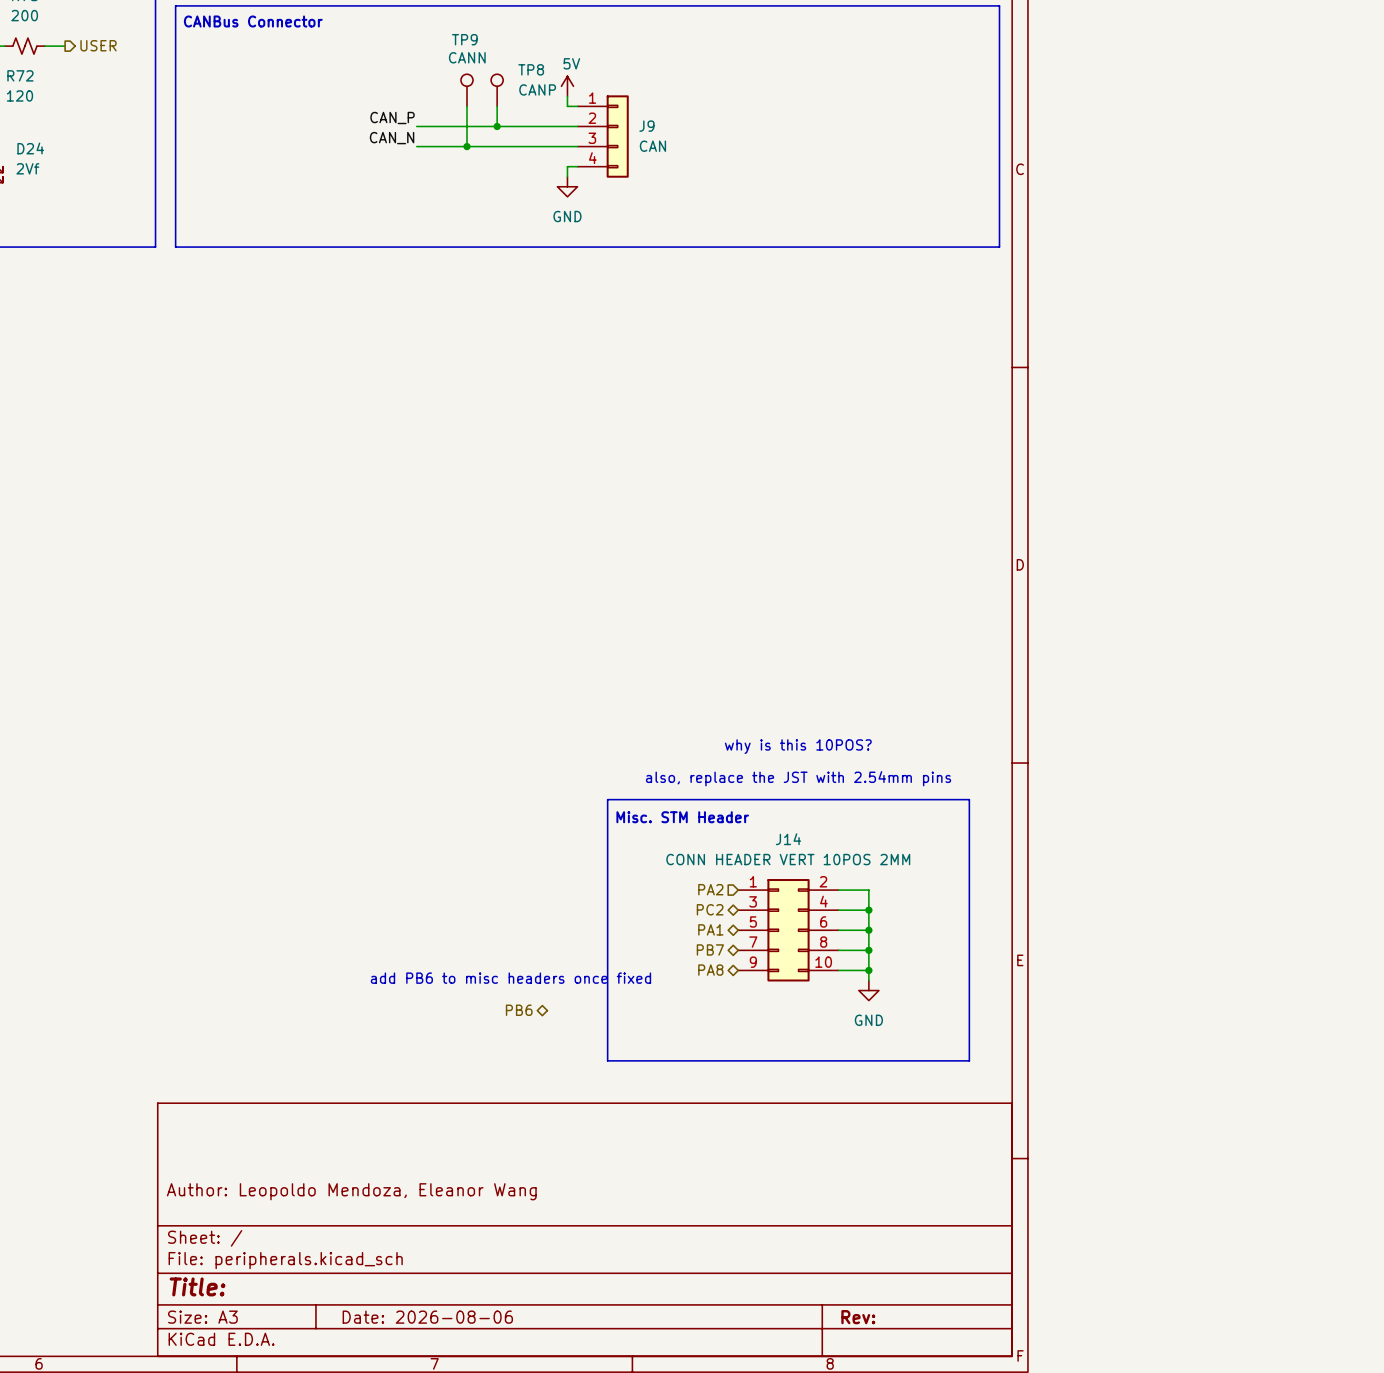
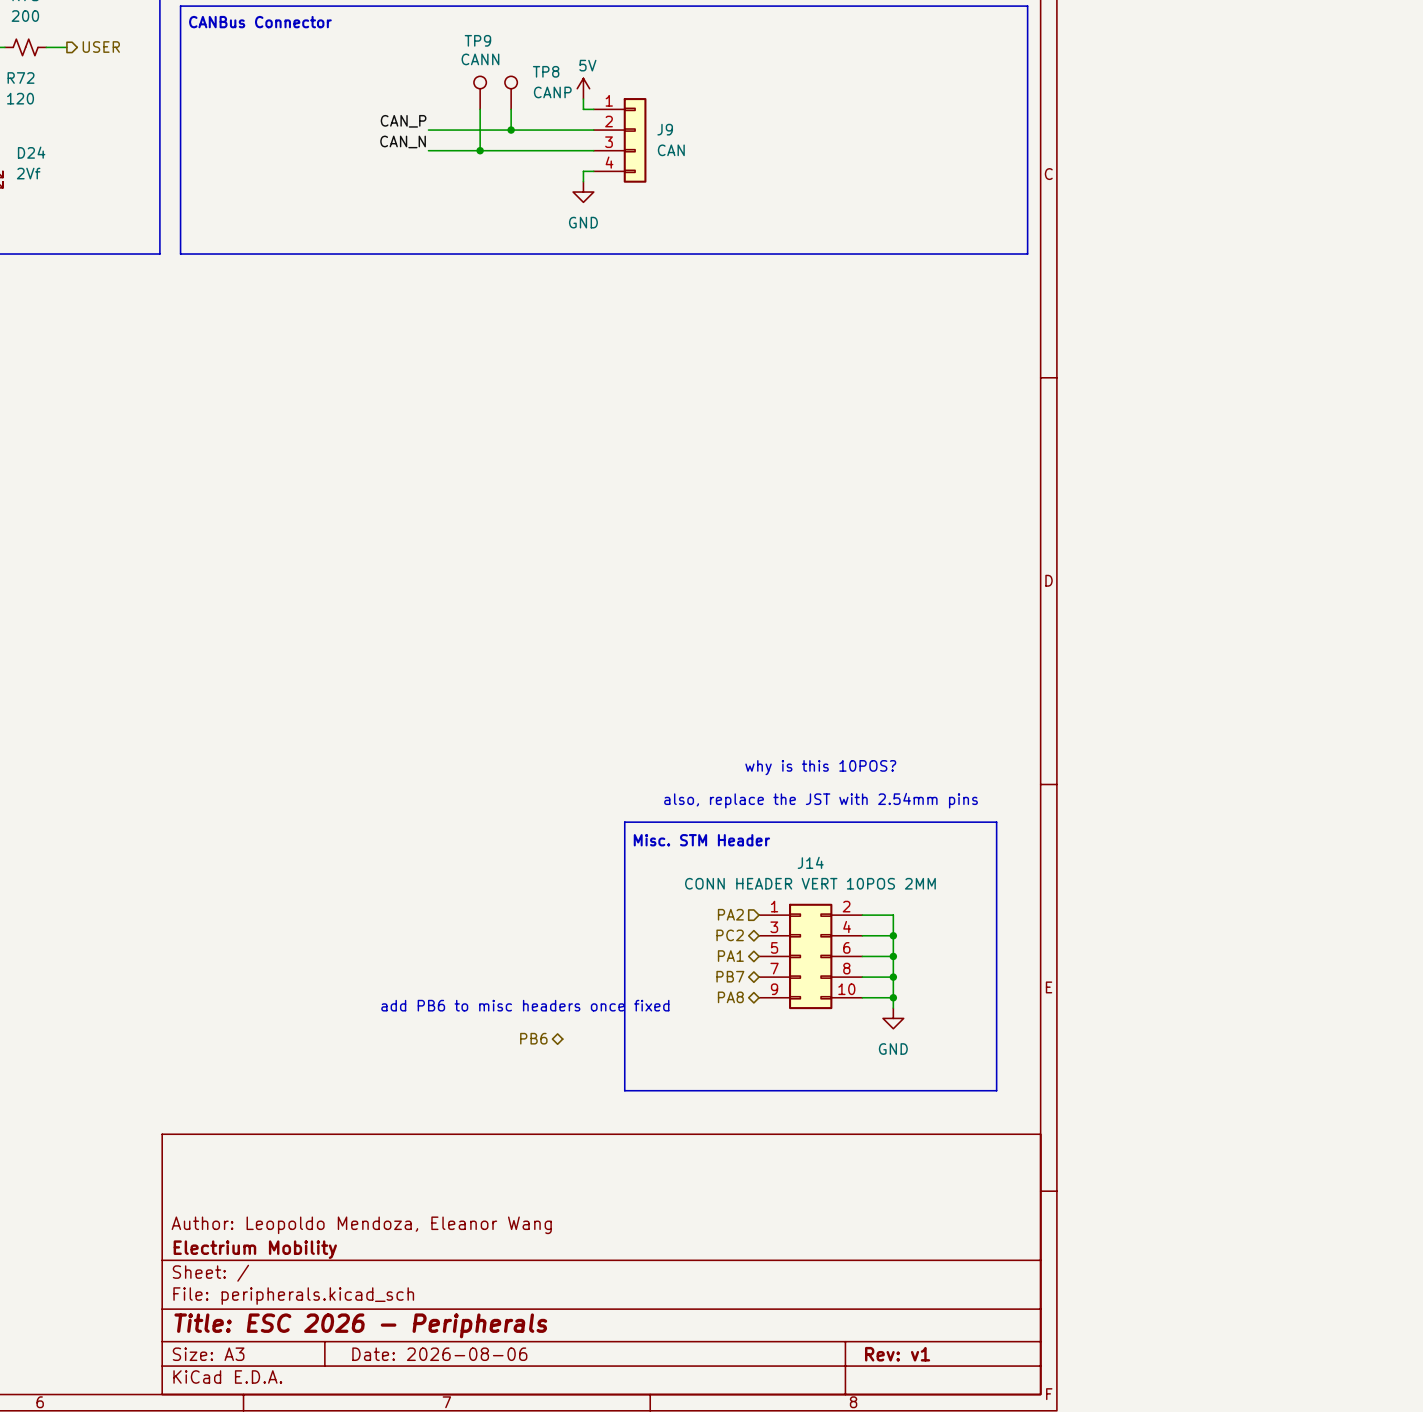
title block: none -> Electrium Mobility (255, 1249)
title block: Title: (197, 1286) -> Title: ESC 2026 - Peripherals (360, 1325)
title block: Rev: (858, 1317) -> Rev: v1 (897, 1354)

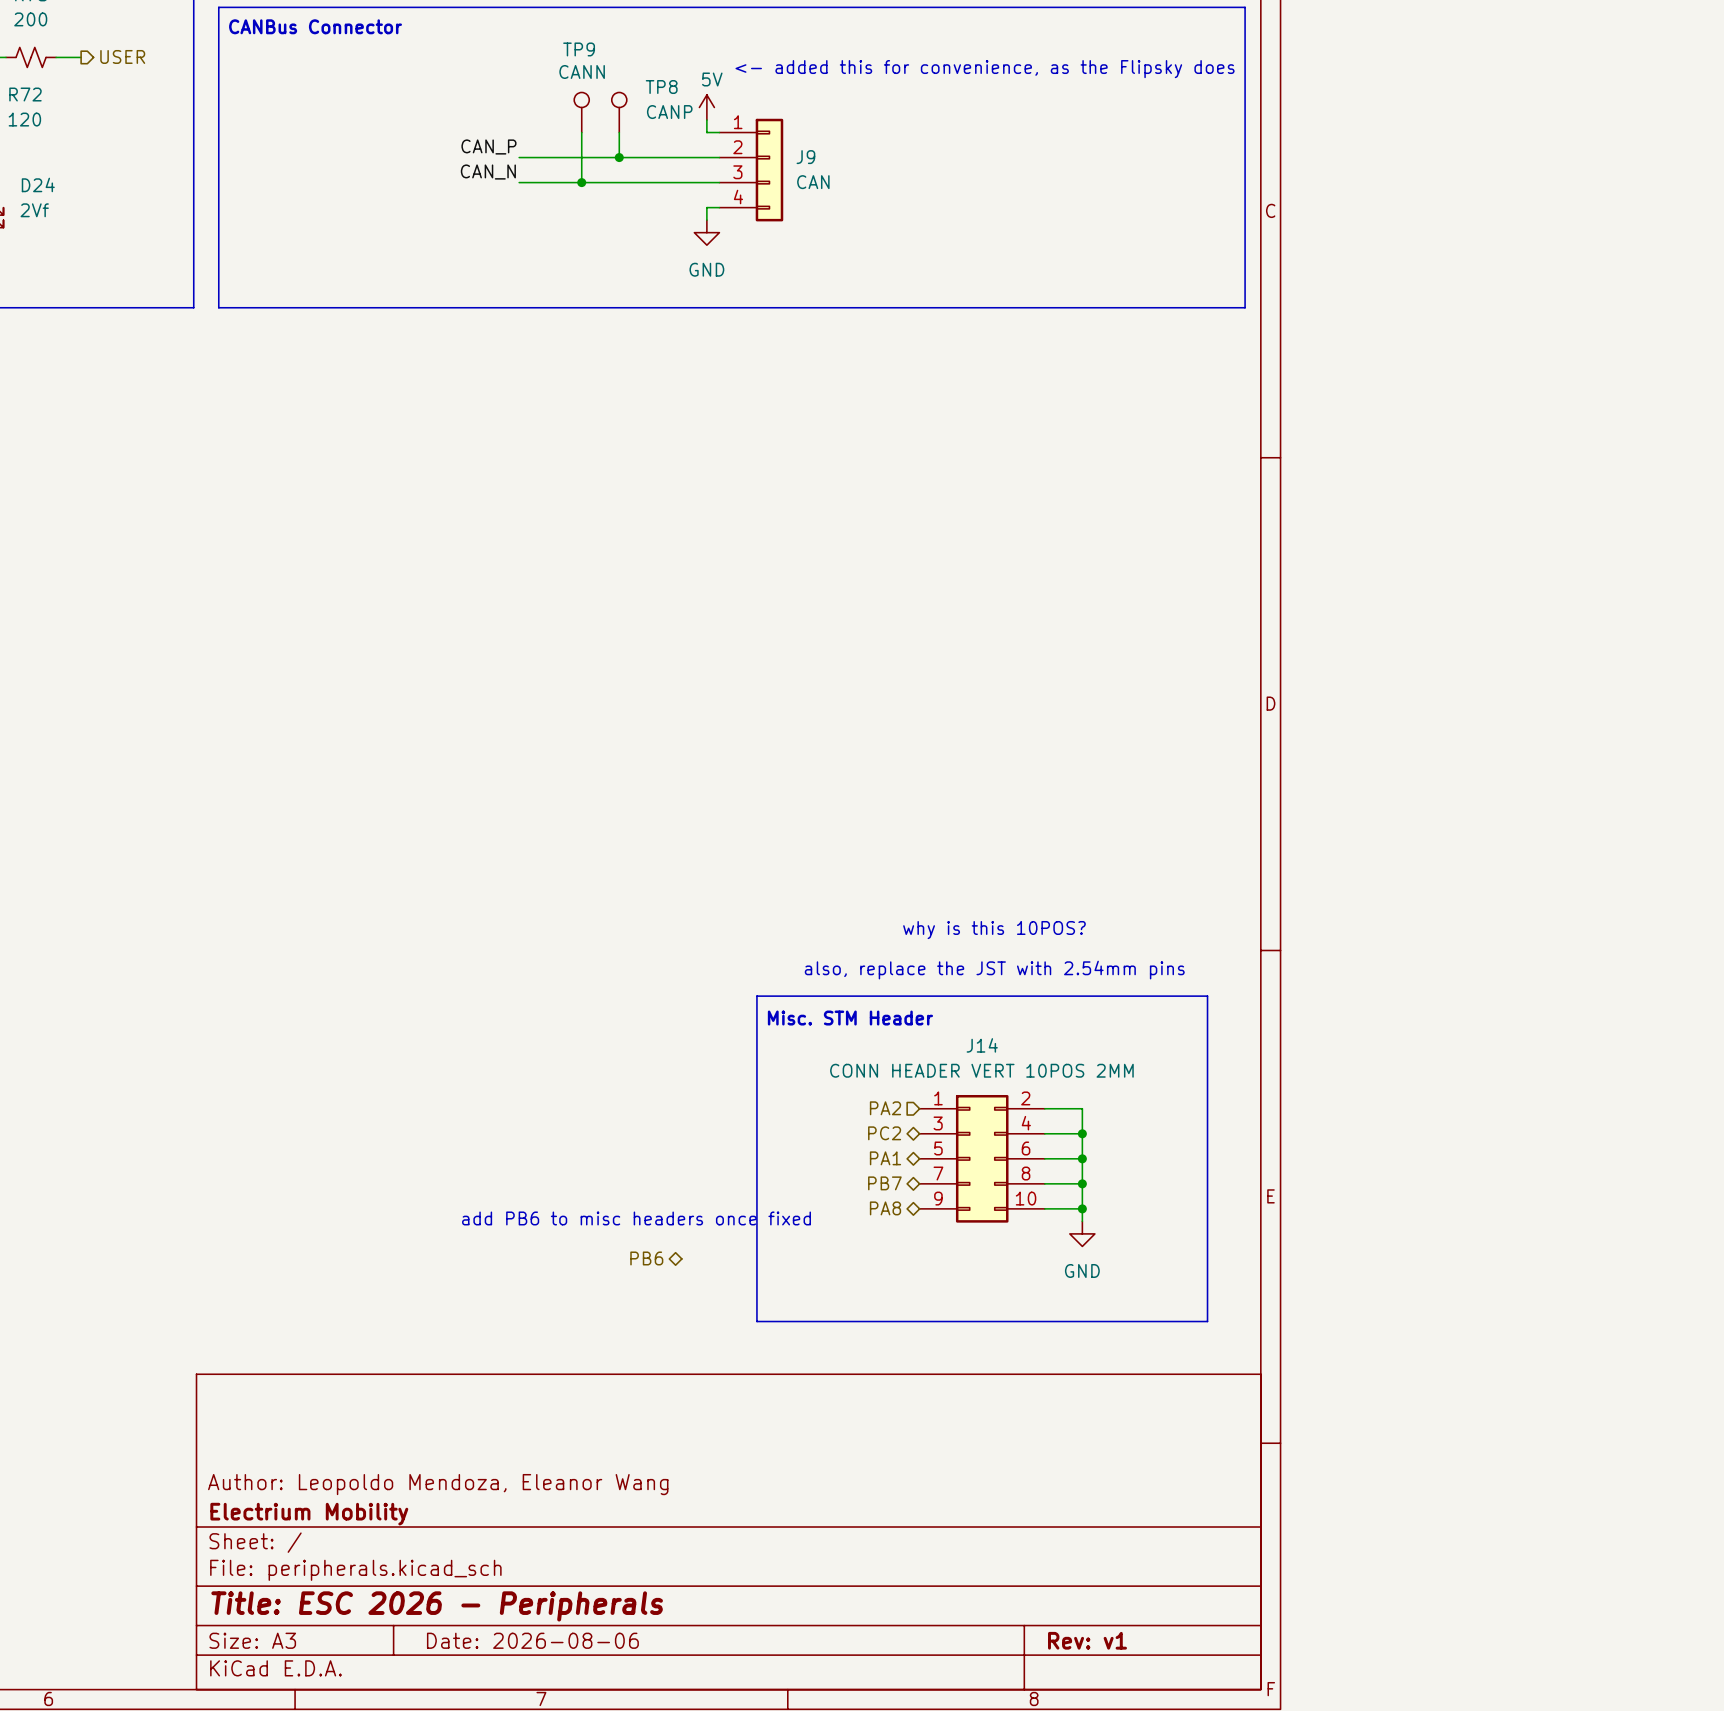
text: none -> <- added this for convenience, as the Flipsky does (985, 69)

